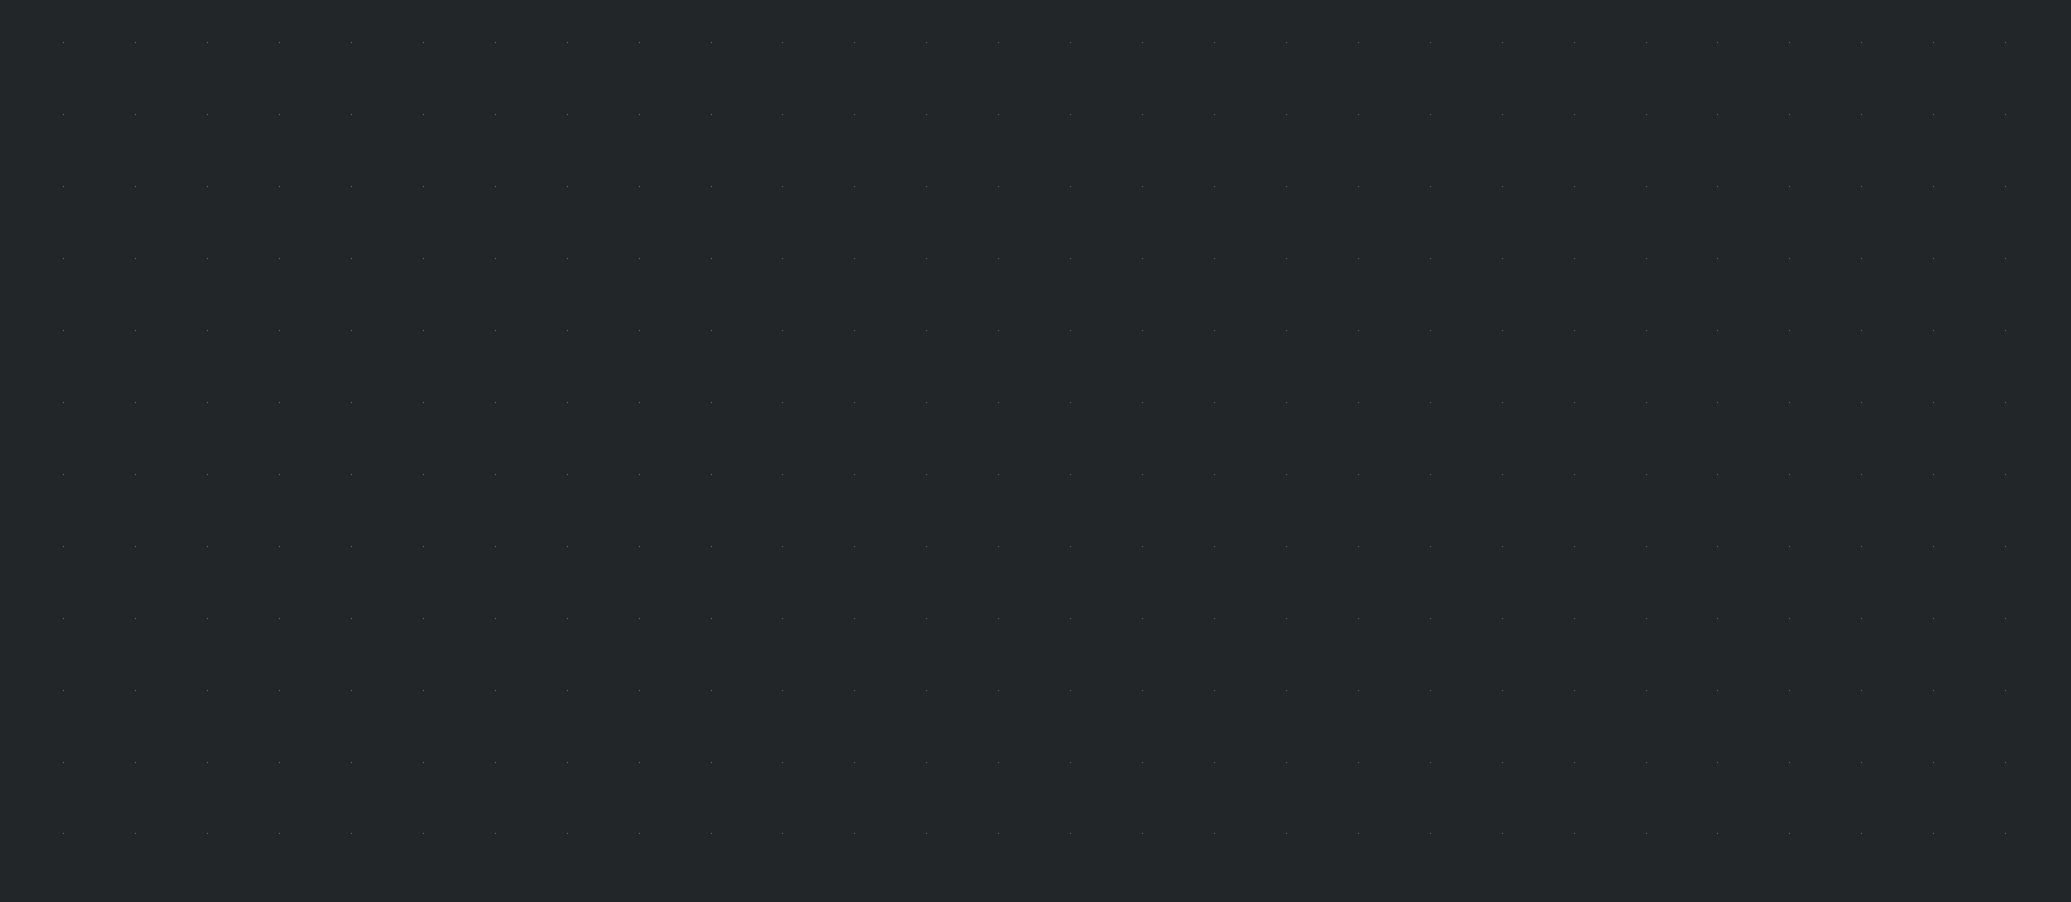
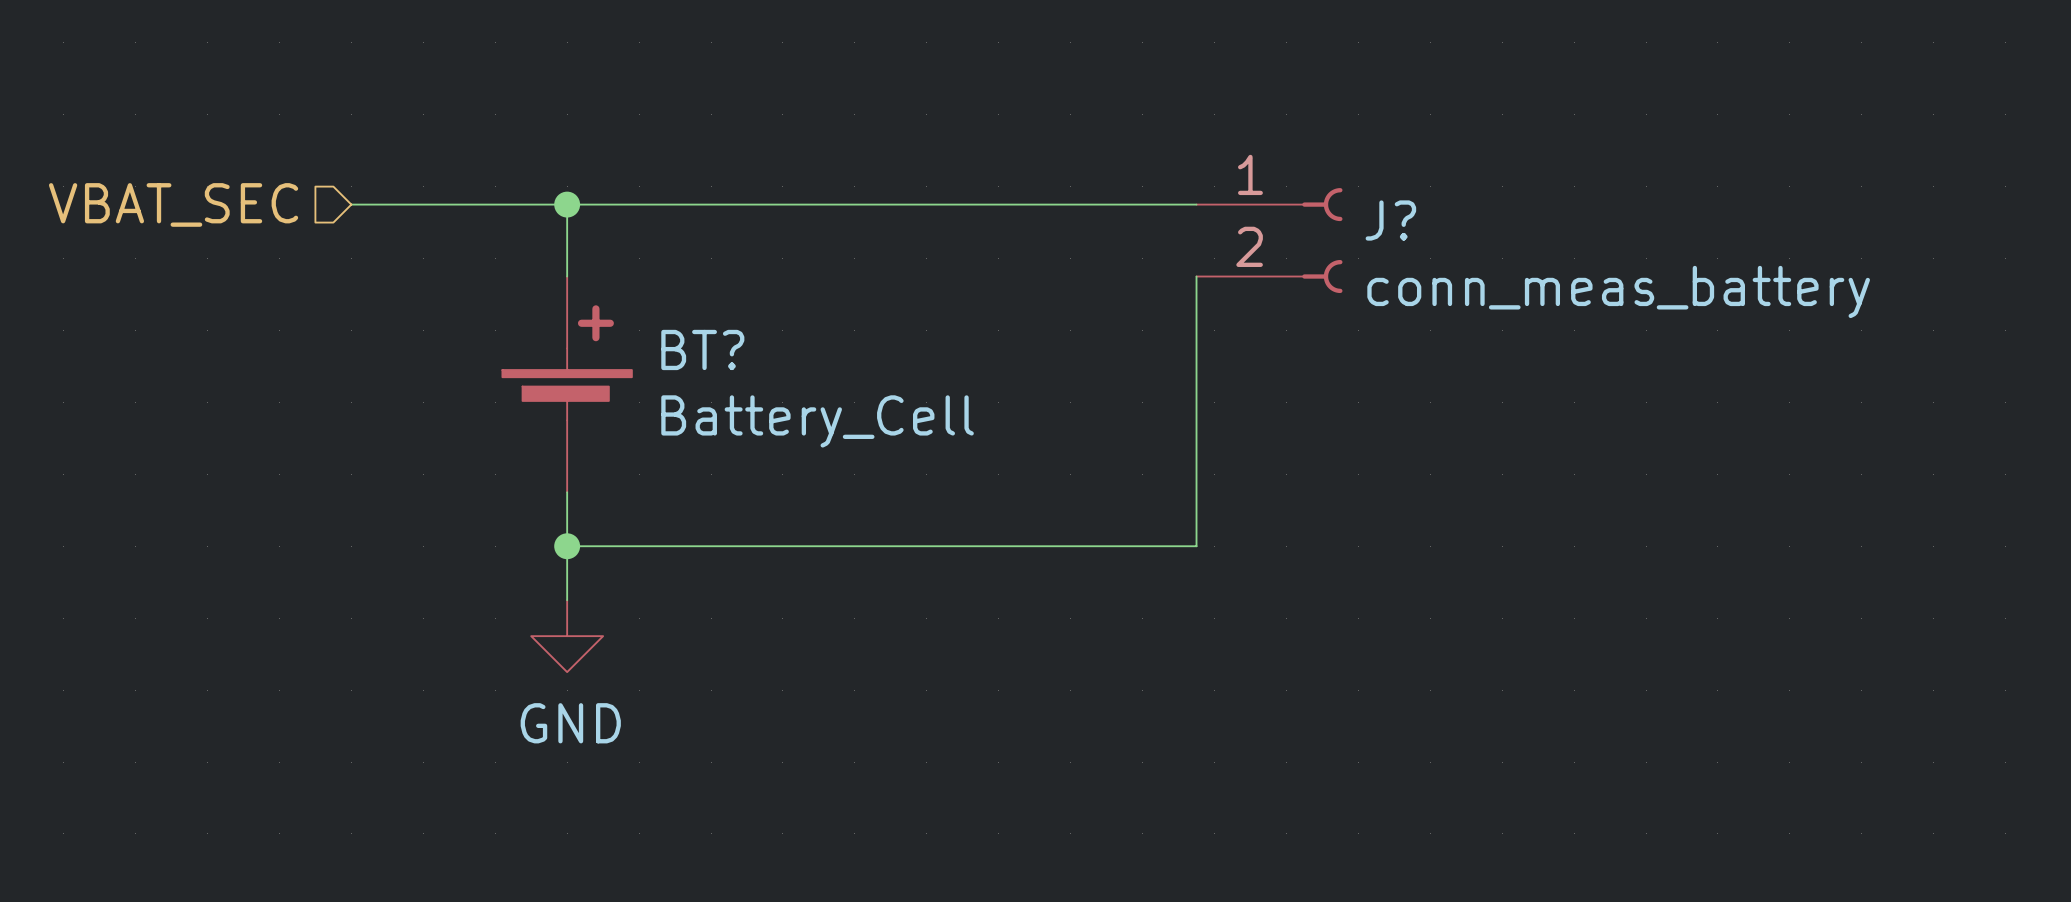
hierarchical label: none -> VBAT_SEC (173, 204)
wire: none -> (351, 204) (1196, 204)
wire: none -> (567, 204) (567, 276)
junction: none -> (567, 204)
J?: none -> conn_meas_battery (1269, 240)
wire: none -> (1196, 276) (1196, 546) (567, 546)
BT?: none -> Battery_Cell (567, 384)
wire: none -> (567, 492) (567, 600)
junction: none -> (567, 546)
power symbol: none -> GND (567, 636)

